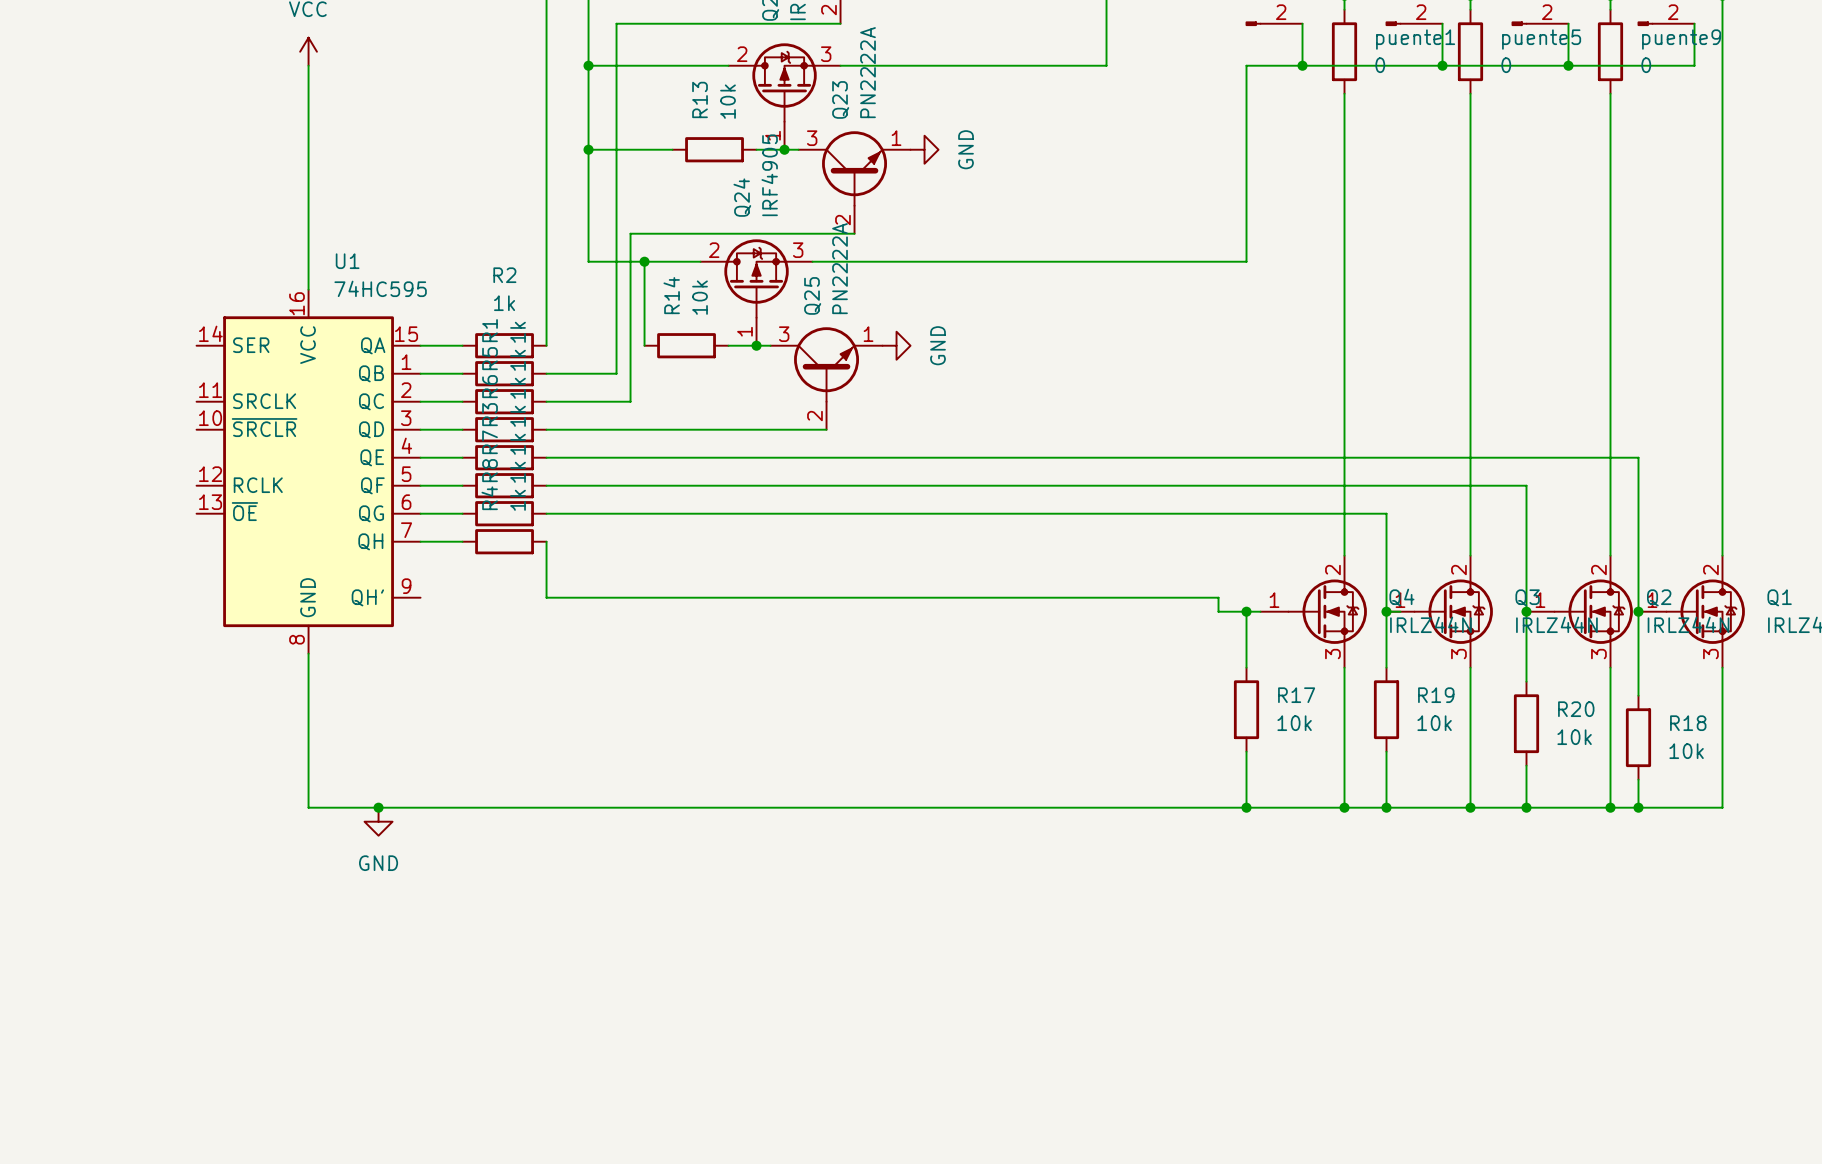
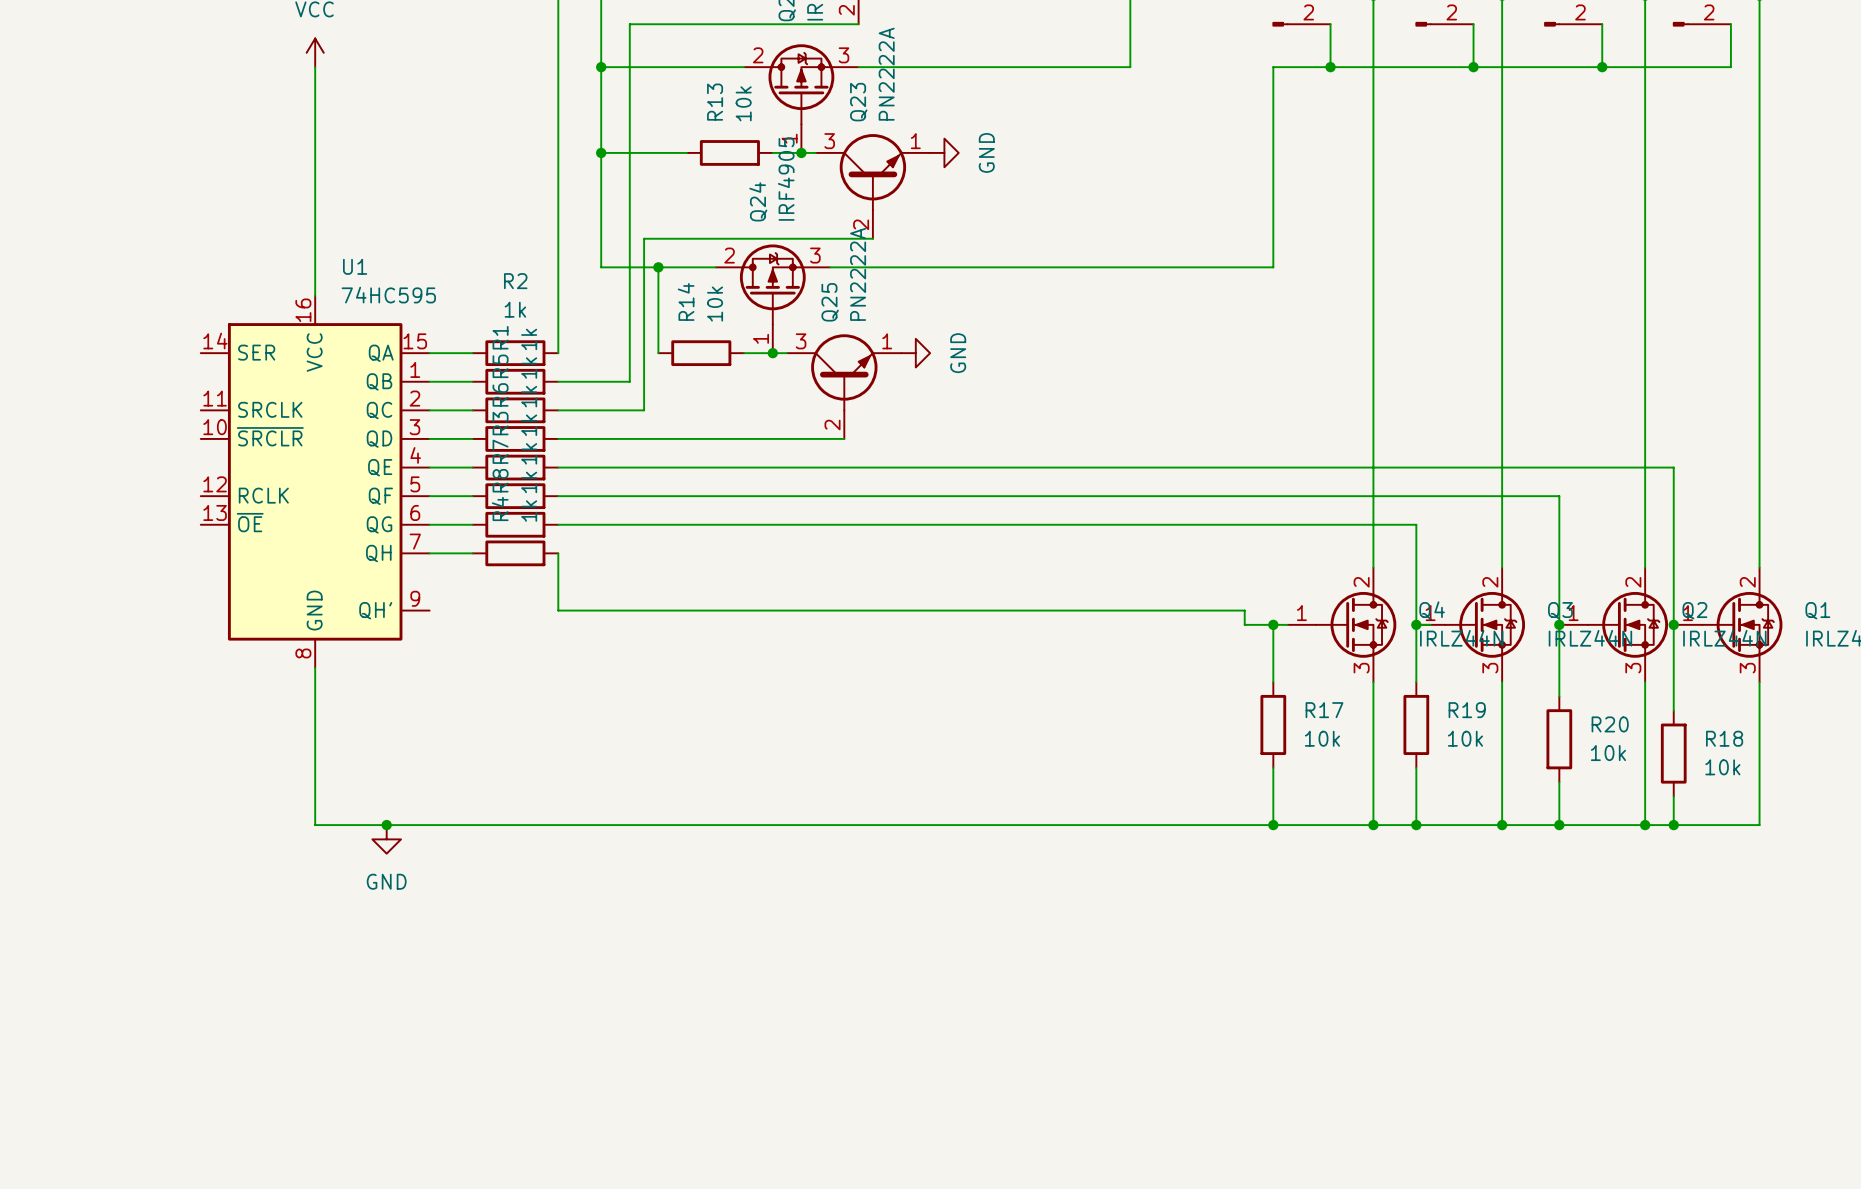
wire: none -> (1373, 9) (1373, 95)
wire: none -> (1502, 9) (1502, 95)
wire: none -> (1645, 9) (1645, 95)
puente1: 0 (1344, 51) -> none
puente5: 0 (1470, 51) -> none
puente9: 0 (1610, 51) -> none

